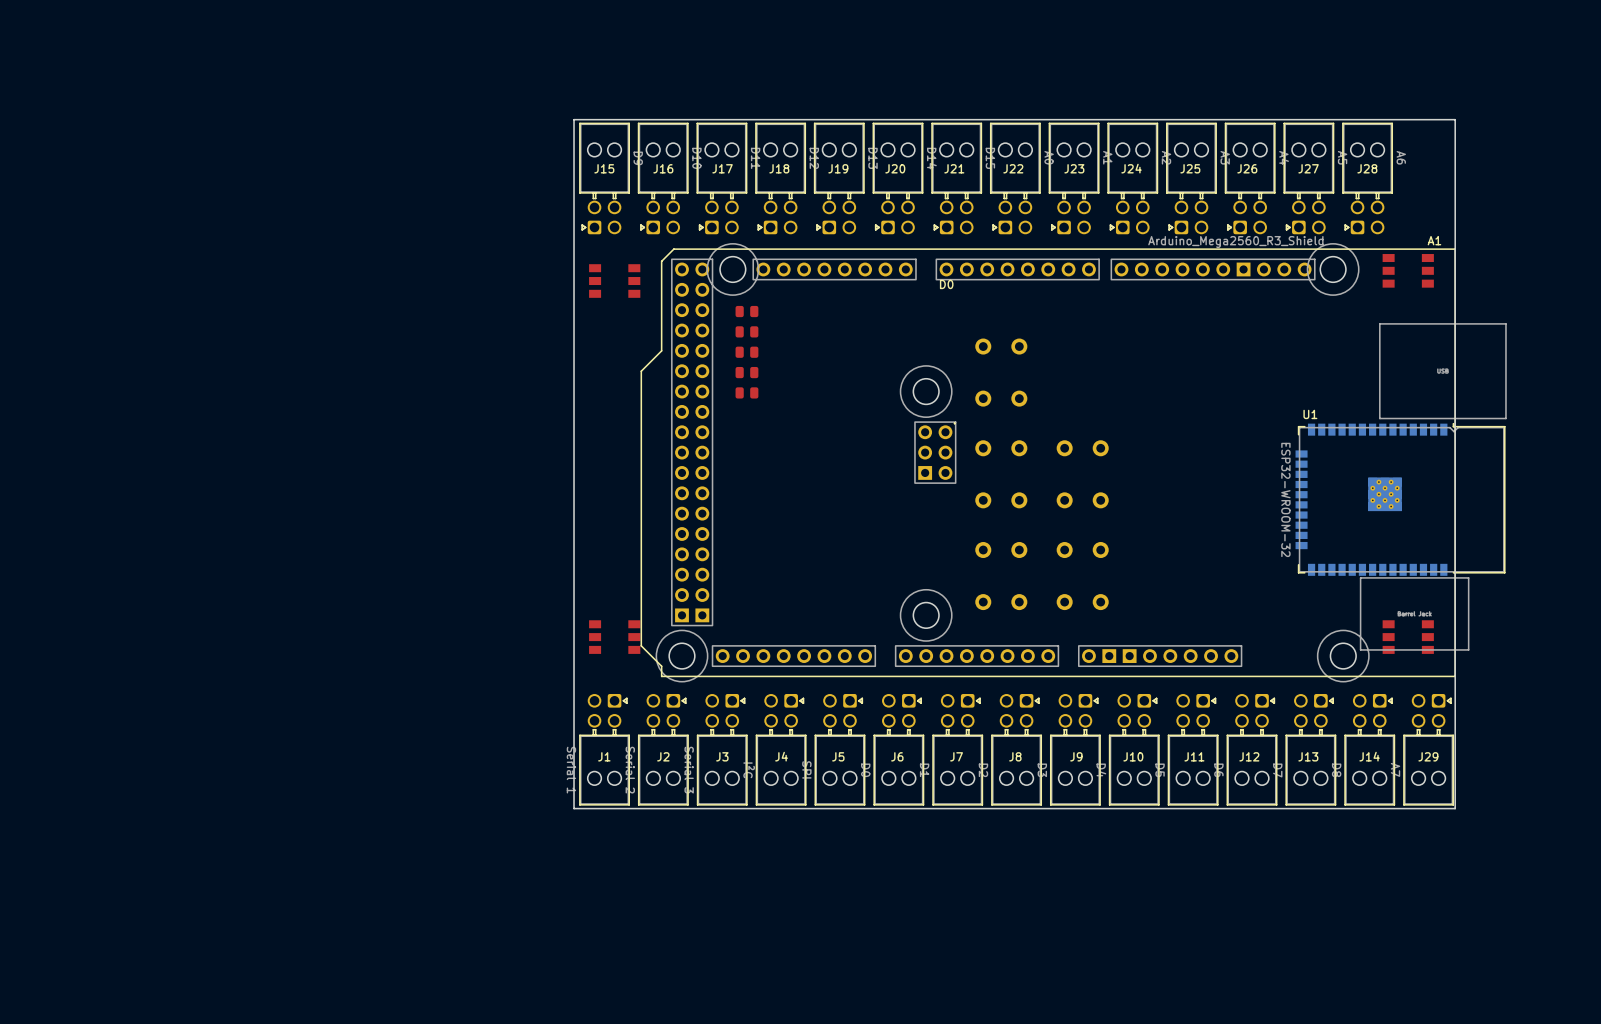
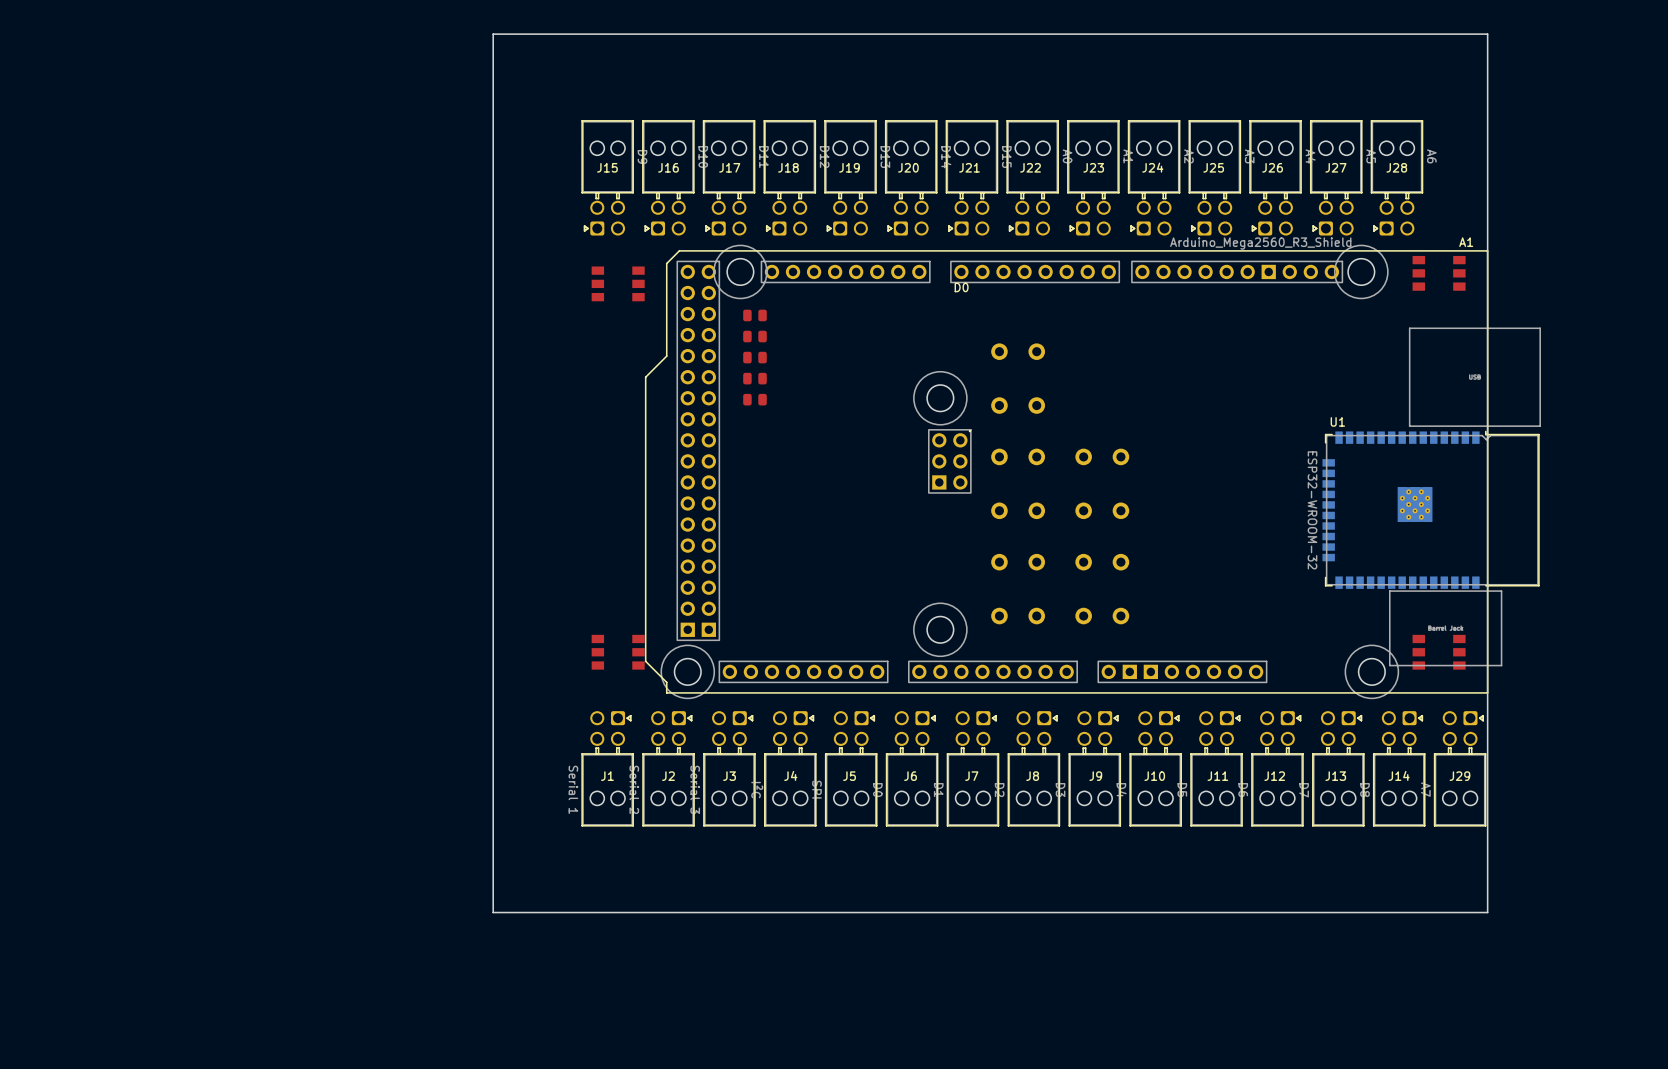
board edge: (1455, 119) (574, 119) (574, 808) (1455, 808) -> (1487, 116) (1487, 34) (493, 34) (493, 912) (1487, 912) (1487, 829)

